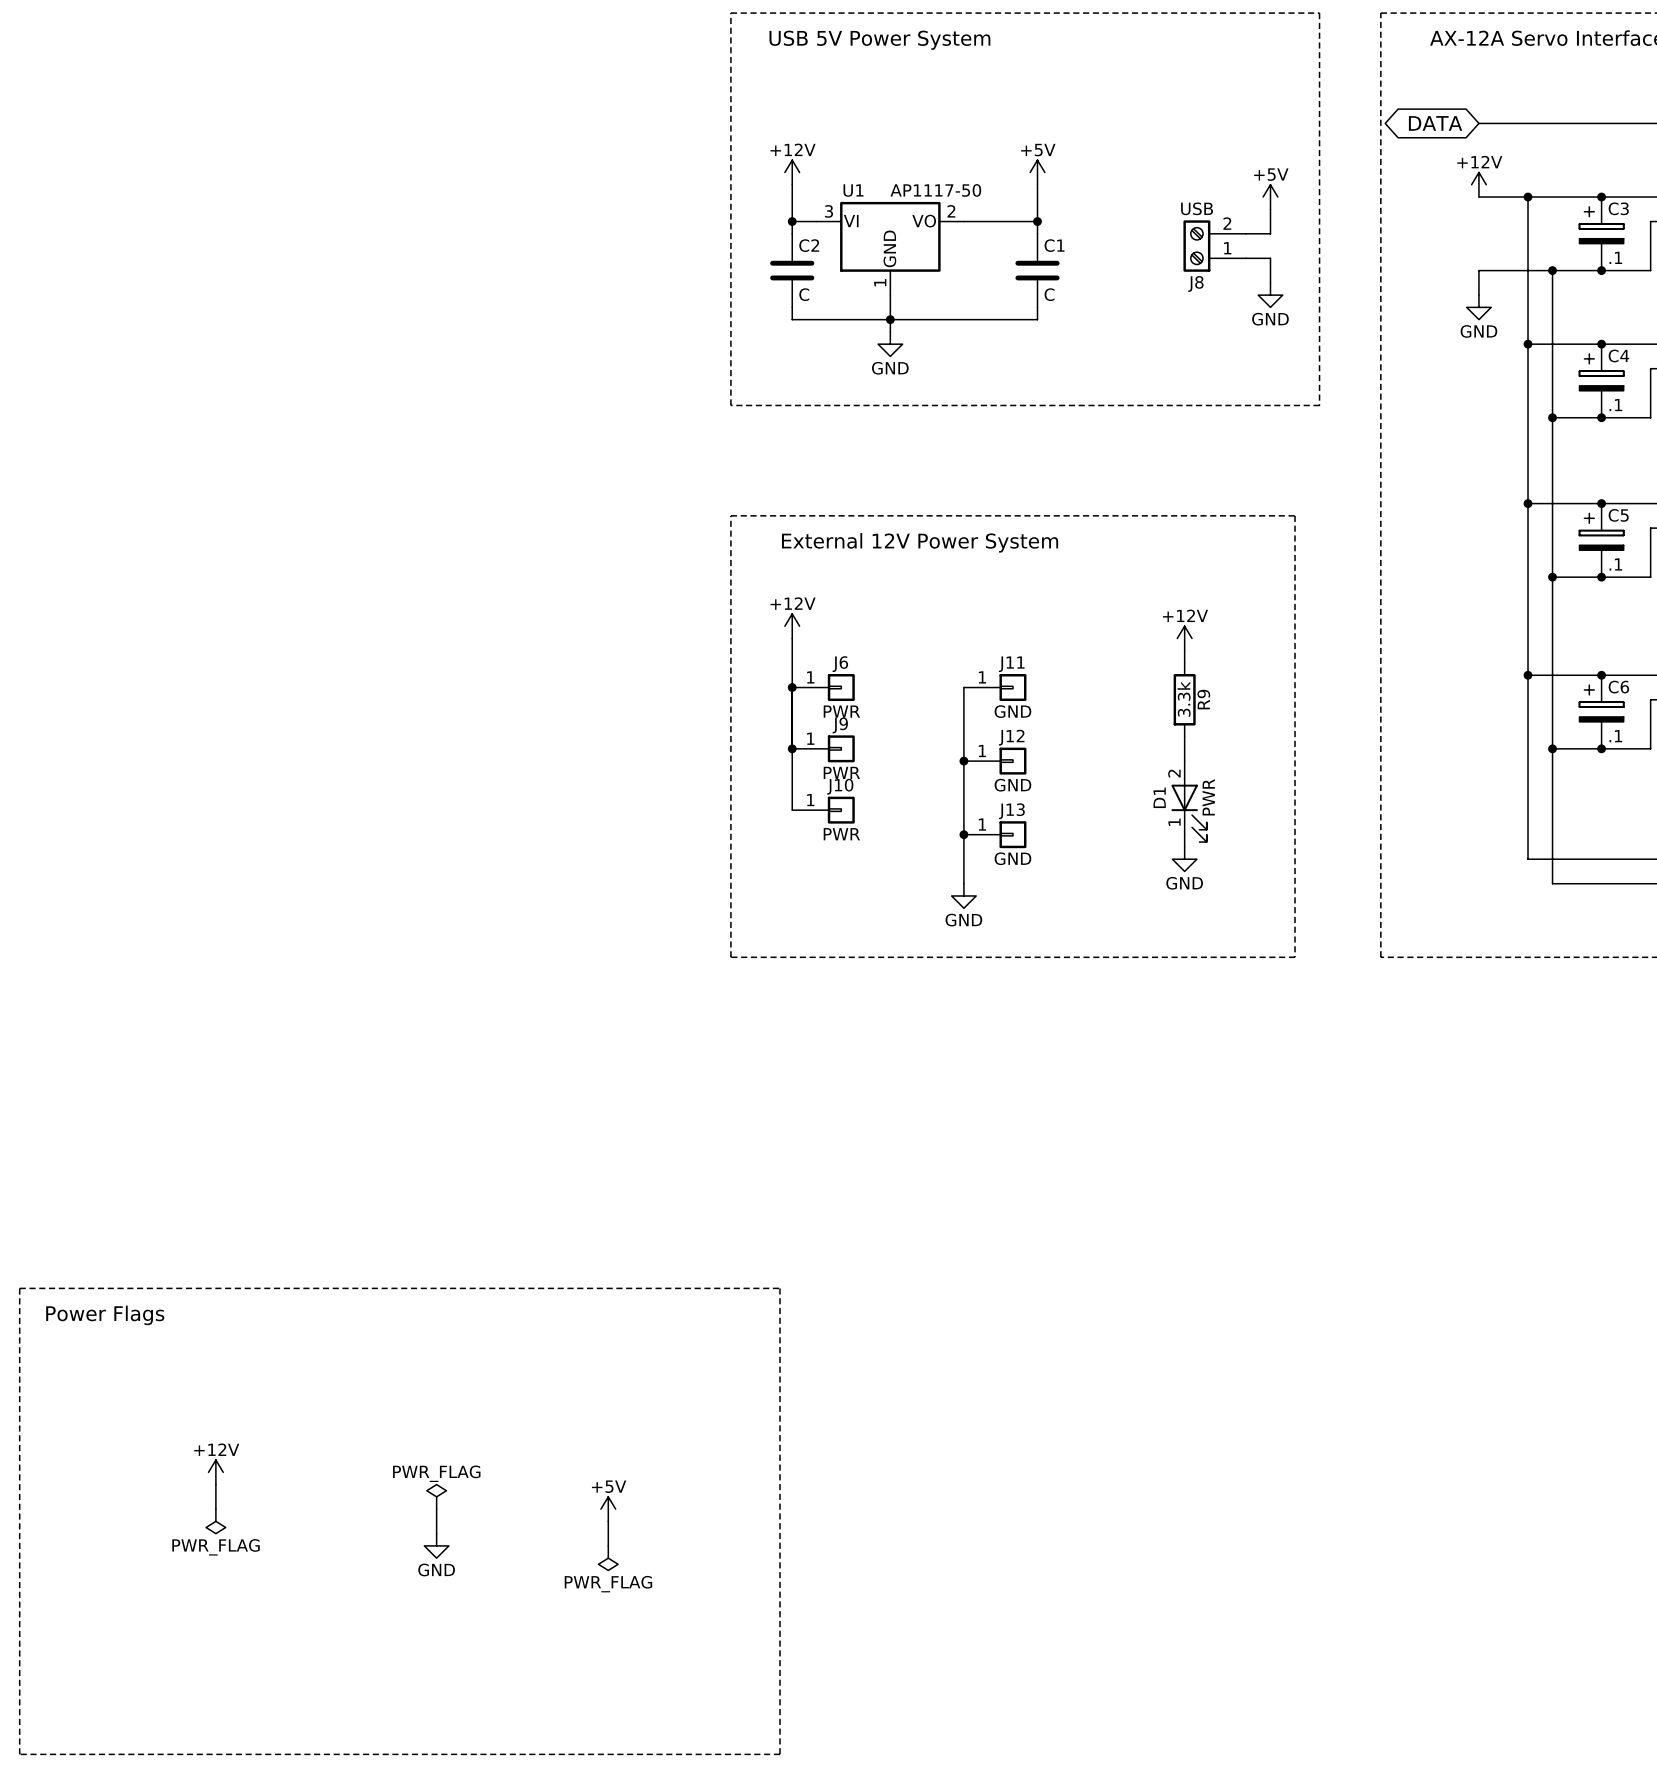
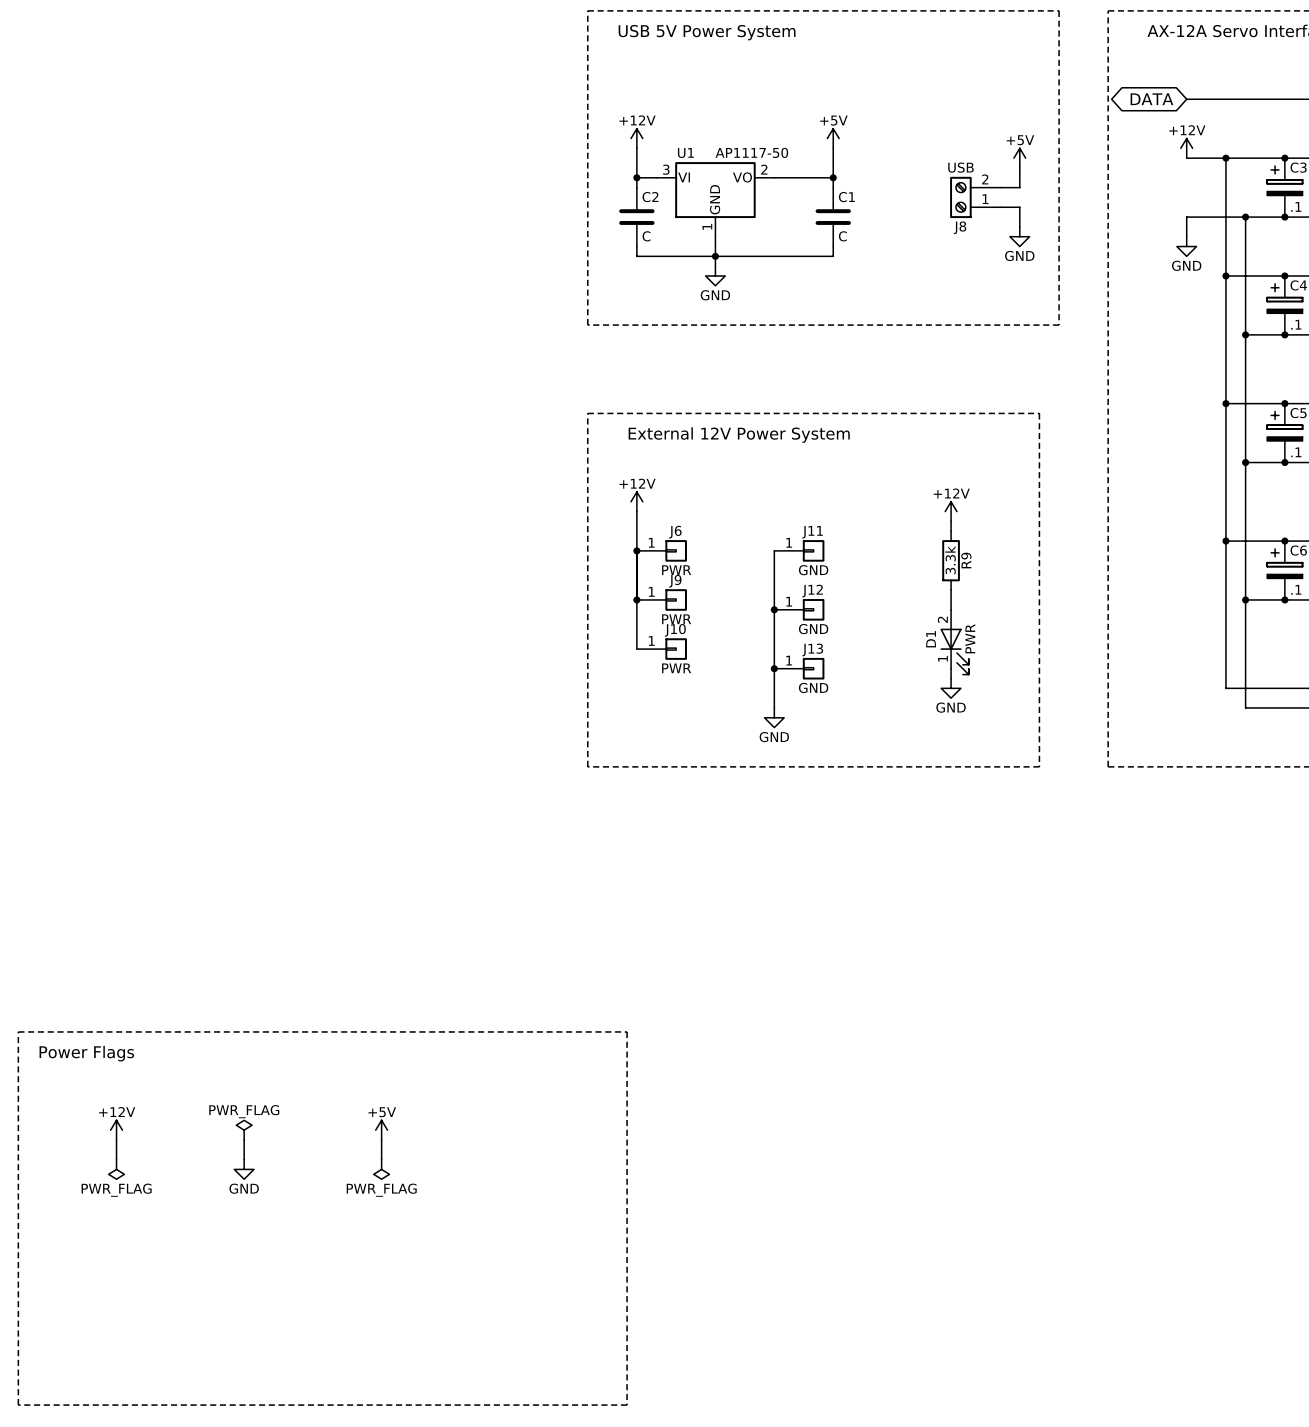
power symbol: none -> PWR_FLAG (244, 1130)
wire: none -> (244, 1139) (244, 1159)
power symbol: none -> PWR_FLAG (116, 1169)
power symbol position: +12V (215, 1472) -> +12V (116, 1130)
wire: (215, 1484) (215, 1509) -> (116, 1139) (116, 1159)
power symbol rotation: 0° (436, 1496) -> 180° (381, 1169)
power symbol position: PWR_FLAG (436, 1496) -> PWR_FLAG (381, 1169)
wire: (436, 1509) (436, 1533) -> (381, 1139) (381, 1159)
power symbol position: +5V (608, 1509) -> +5V (381, 1130)
power symbol: PWR_FLAG (215, 1521) -> none
wire: (608, 1521) (608, 1545) -> none
power symbol position: GND (436, 1545) -> GND (244, 1169)
power symbol: PWR_FLAG (608, 1558) -> none

